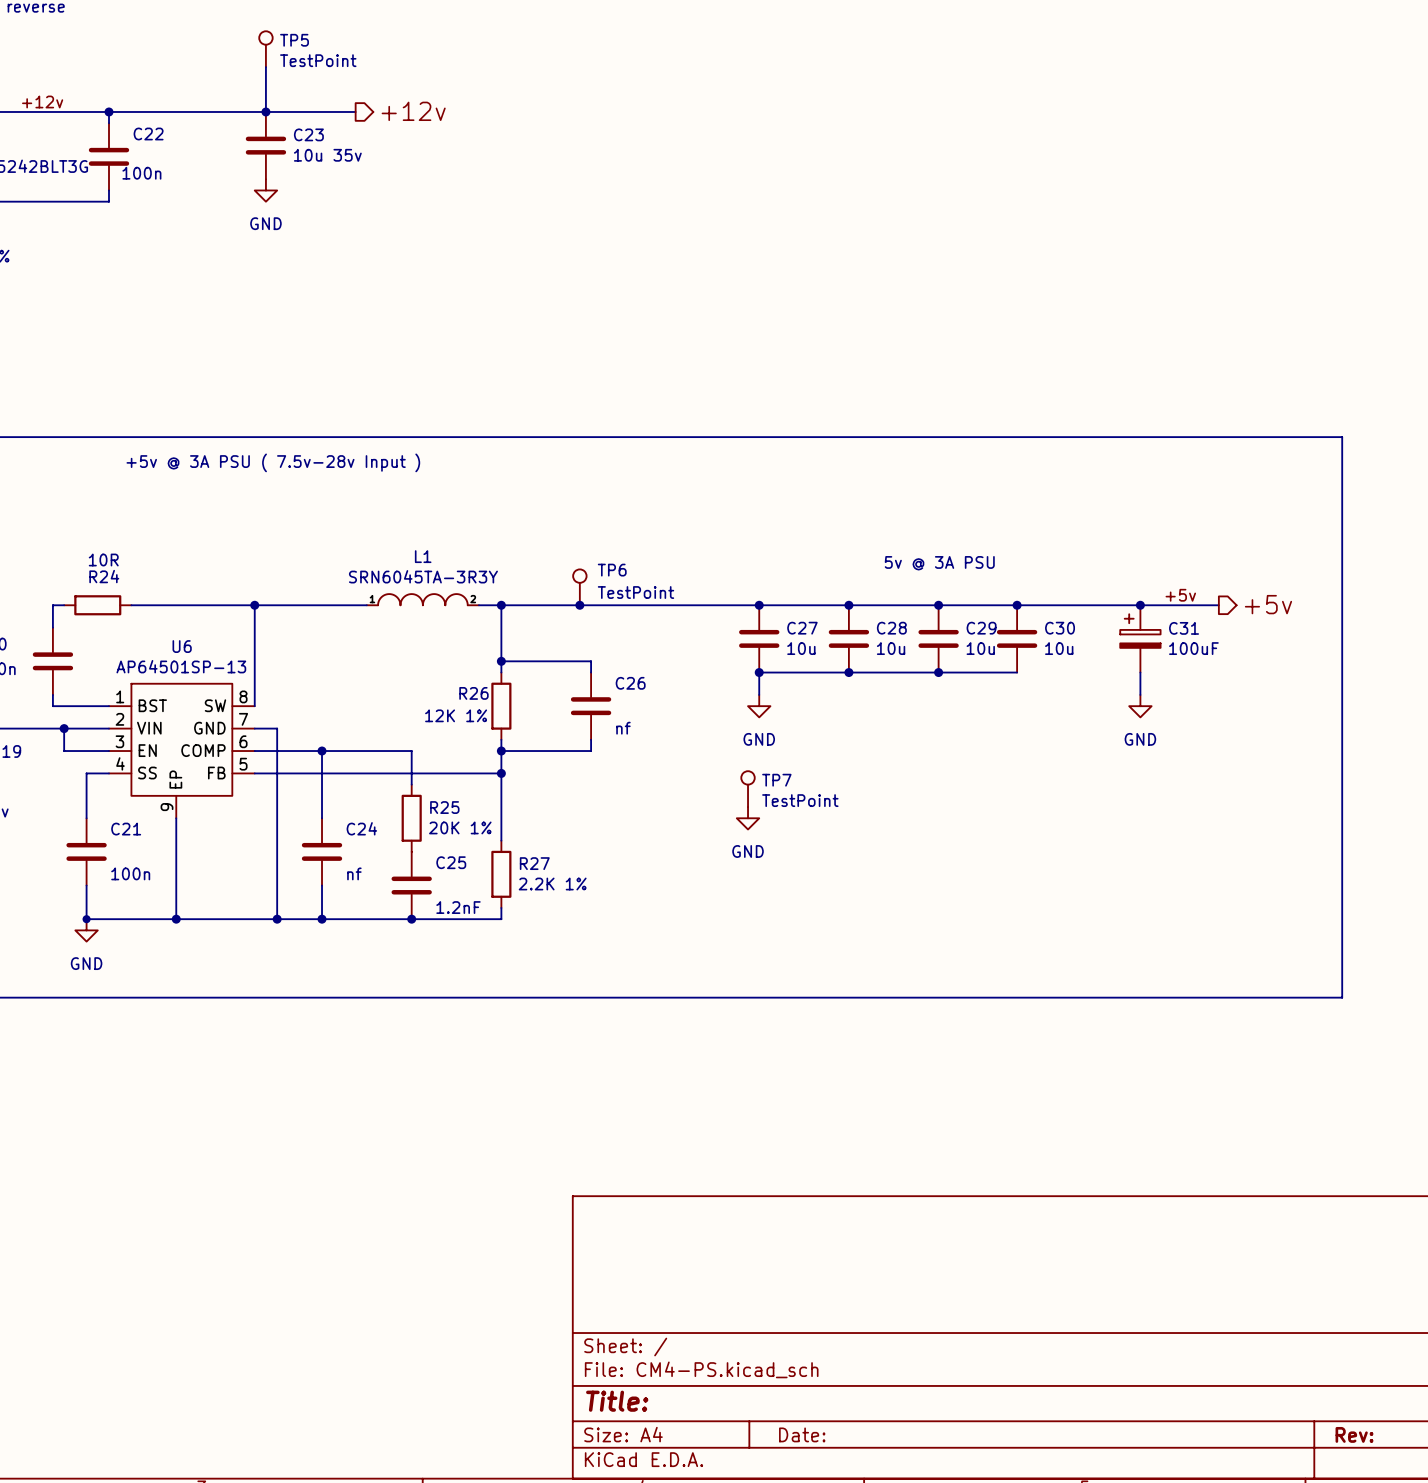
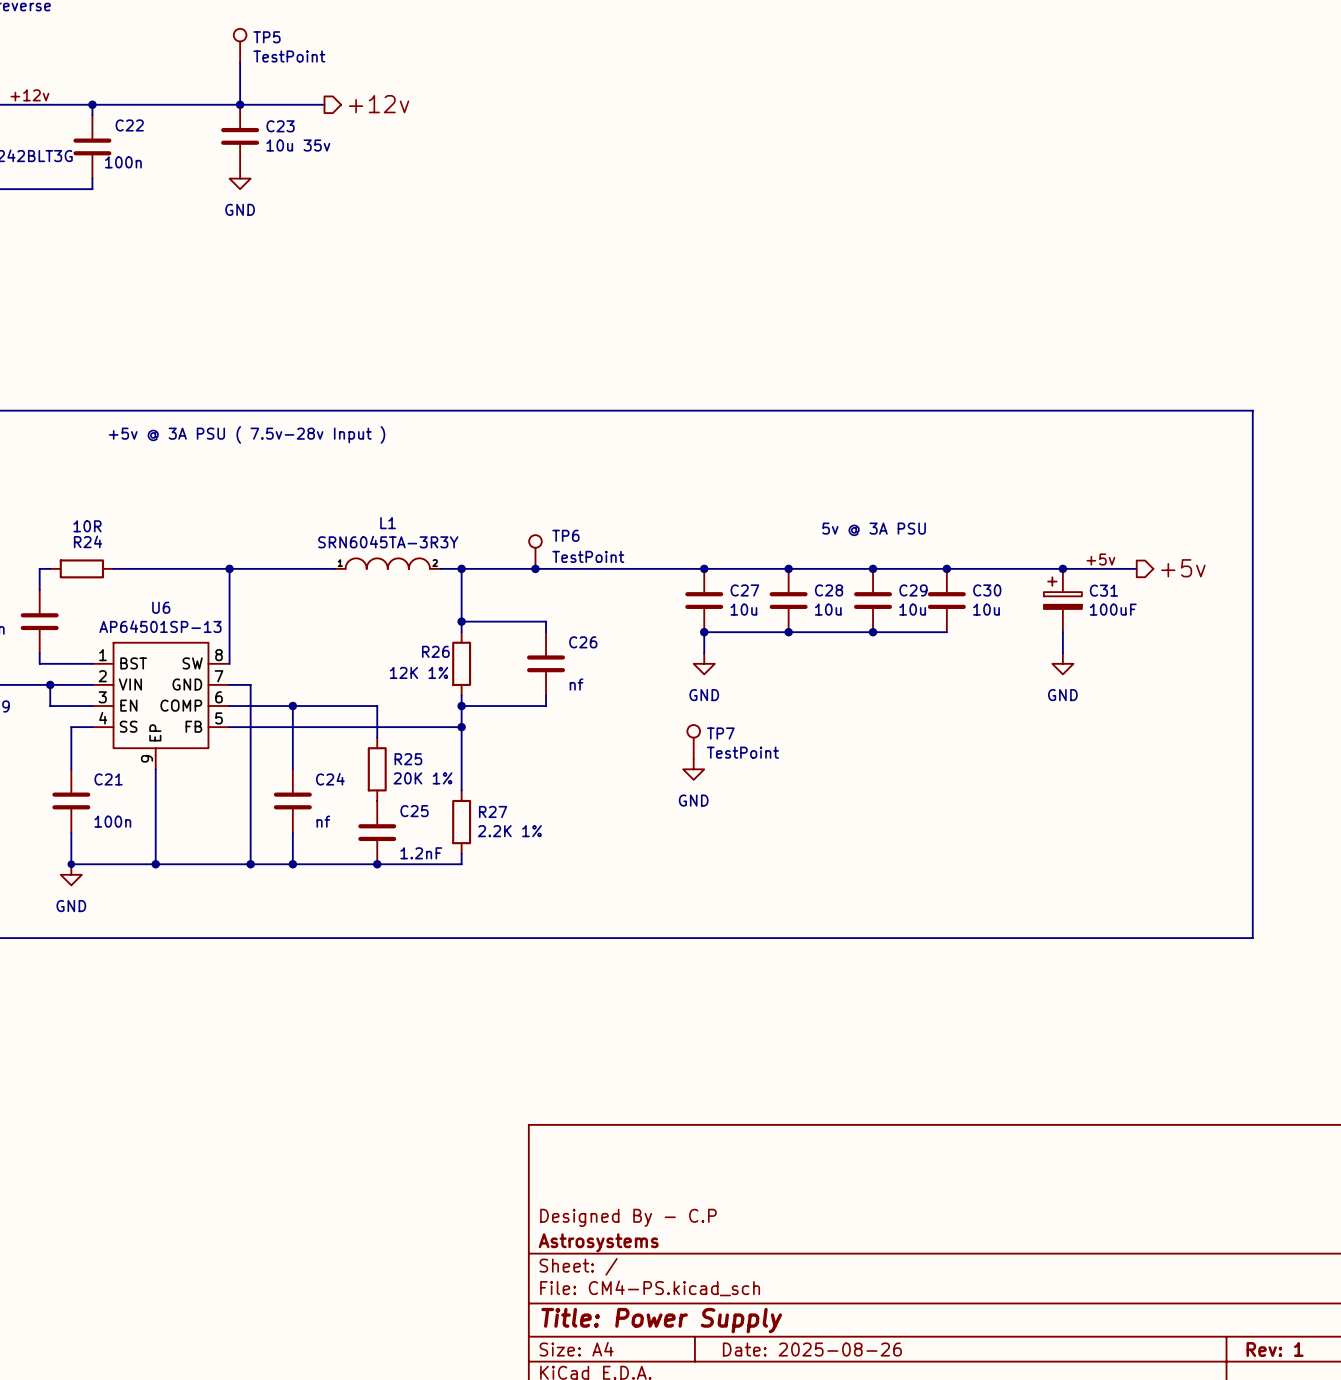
title block: none -> Designed By - C.P (628, 1217)
title block: none -> Astrosystems (598, 1242)
title block: Title: (617, 1401) -> Title: Power Supply (661, 1320)
title block: Date: (802, 1434) -> Date: 2025-08-26 (812, 1349)
title block: Rev: (1354, 1434) -> Rev: 1 (1275, 1349)

